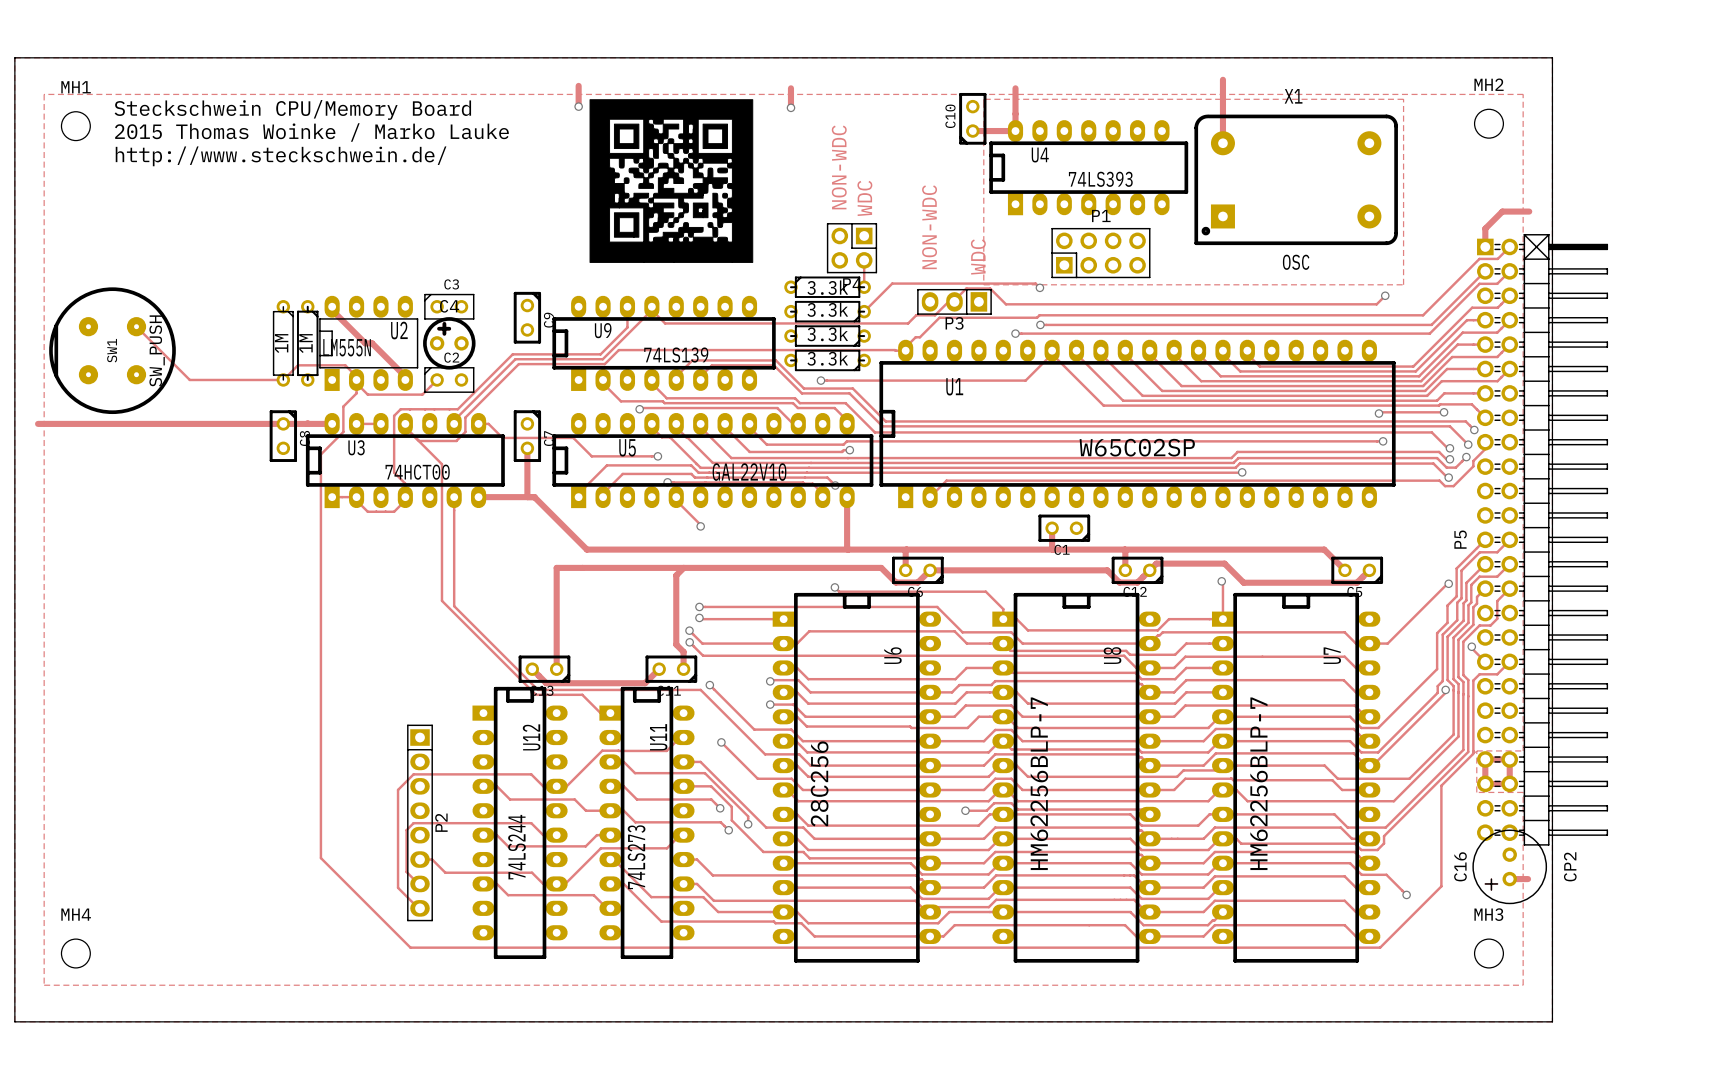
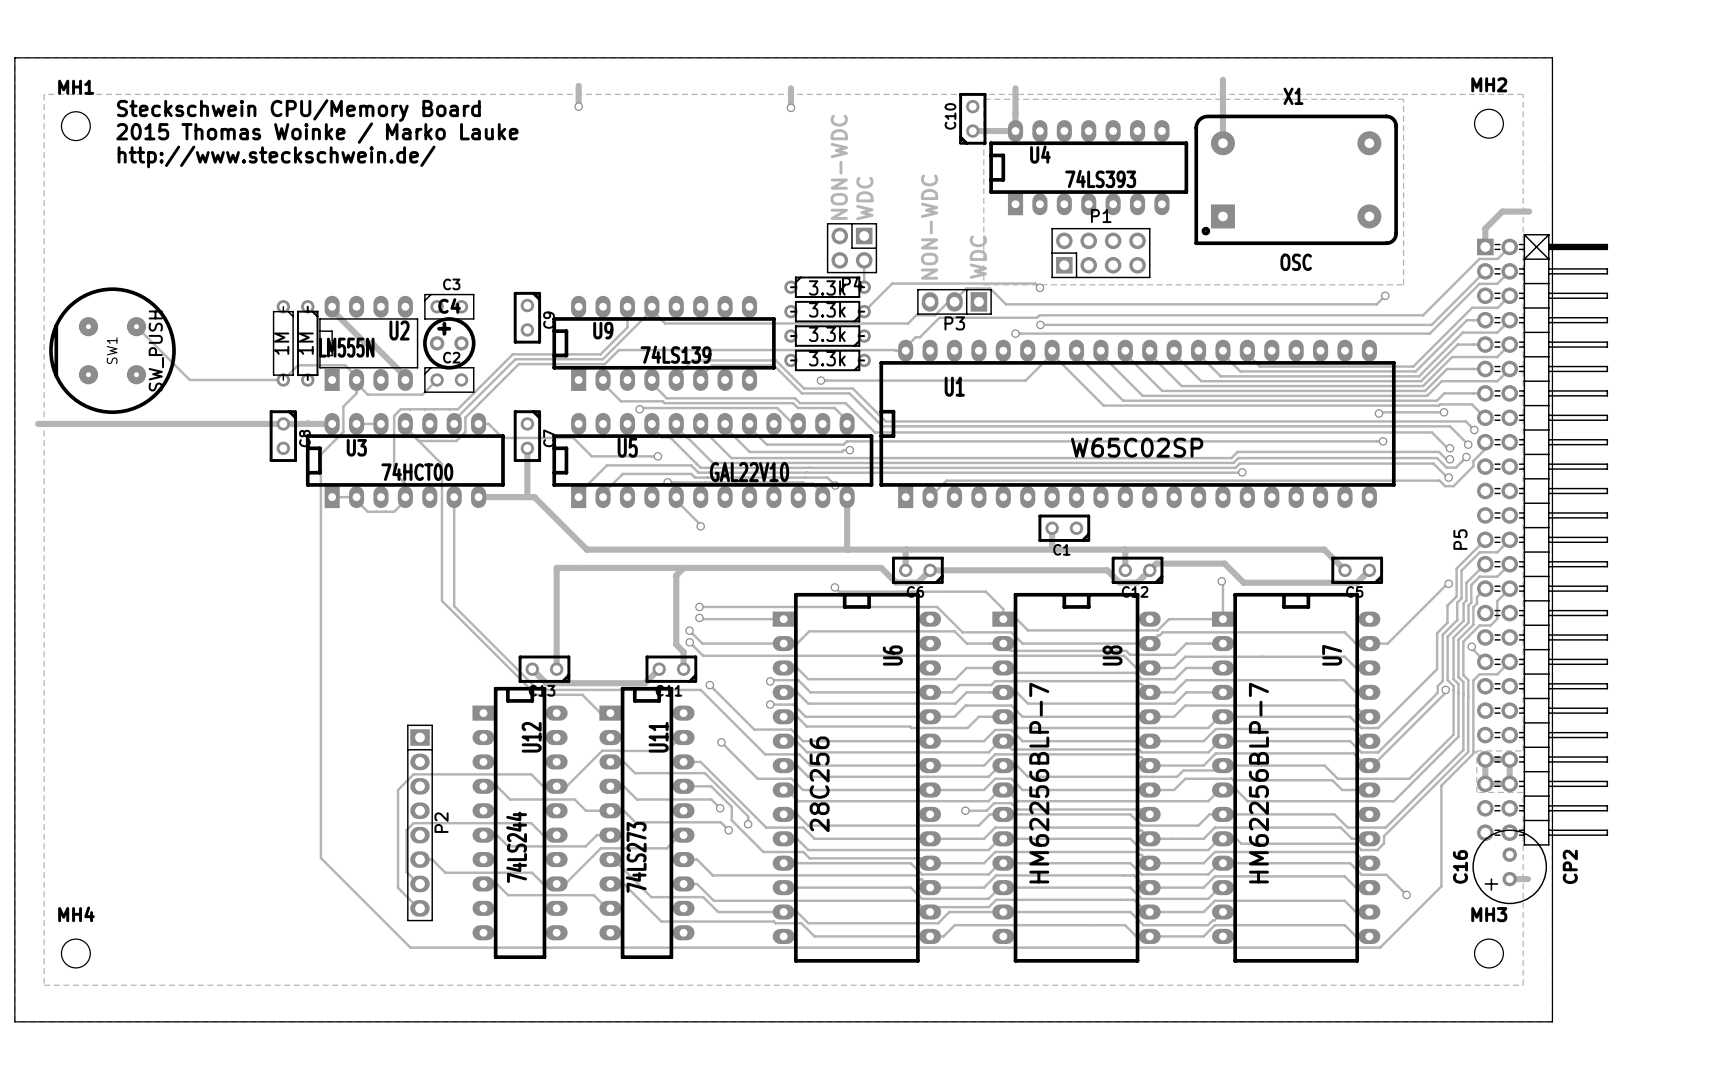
drawing: [589, 99, 754, 263] -> none

